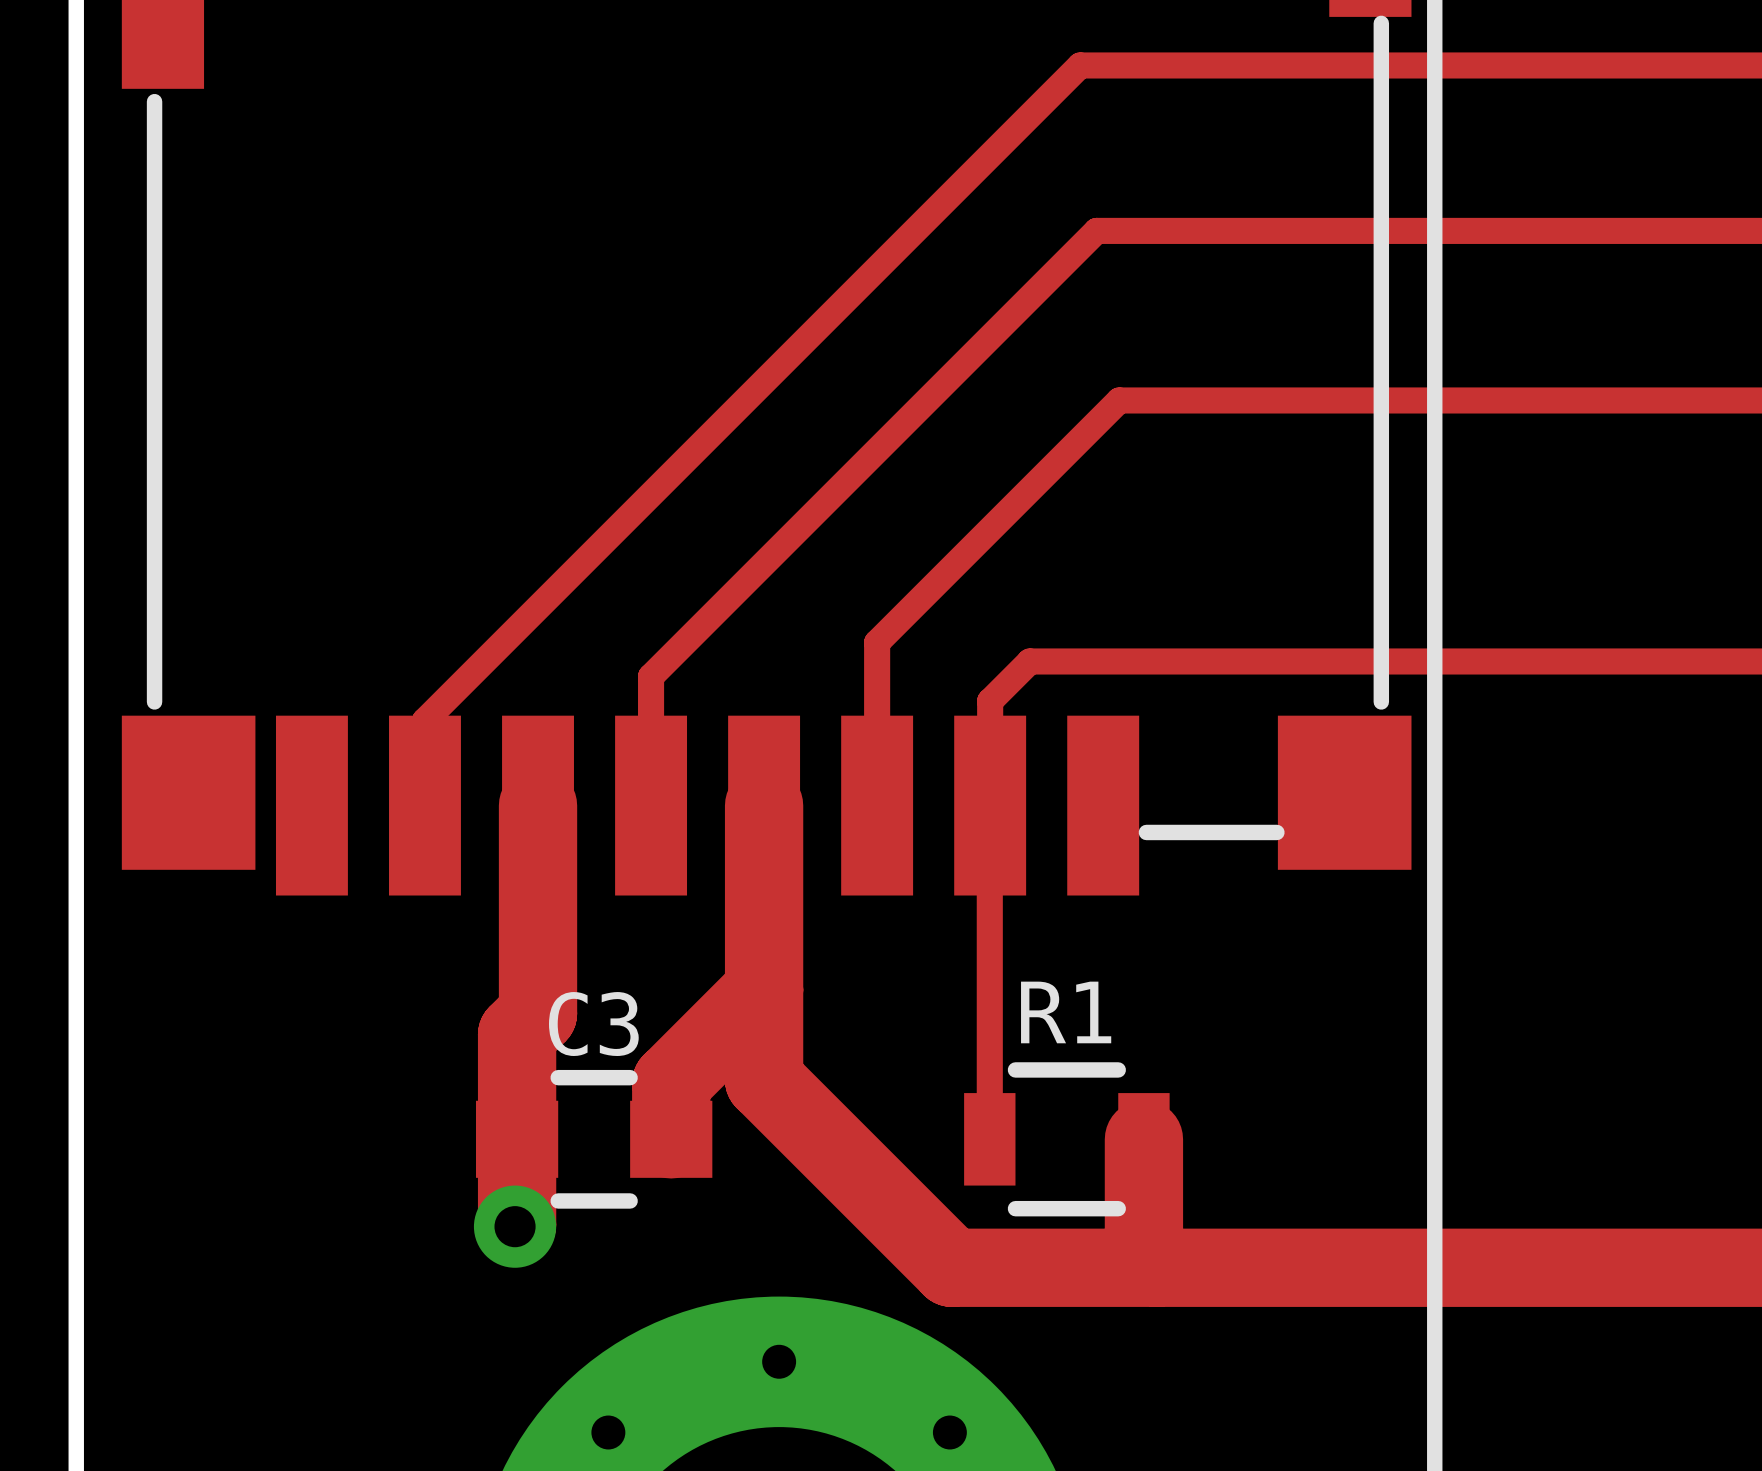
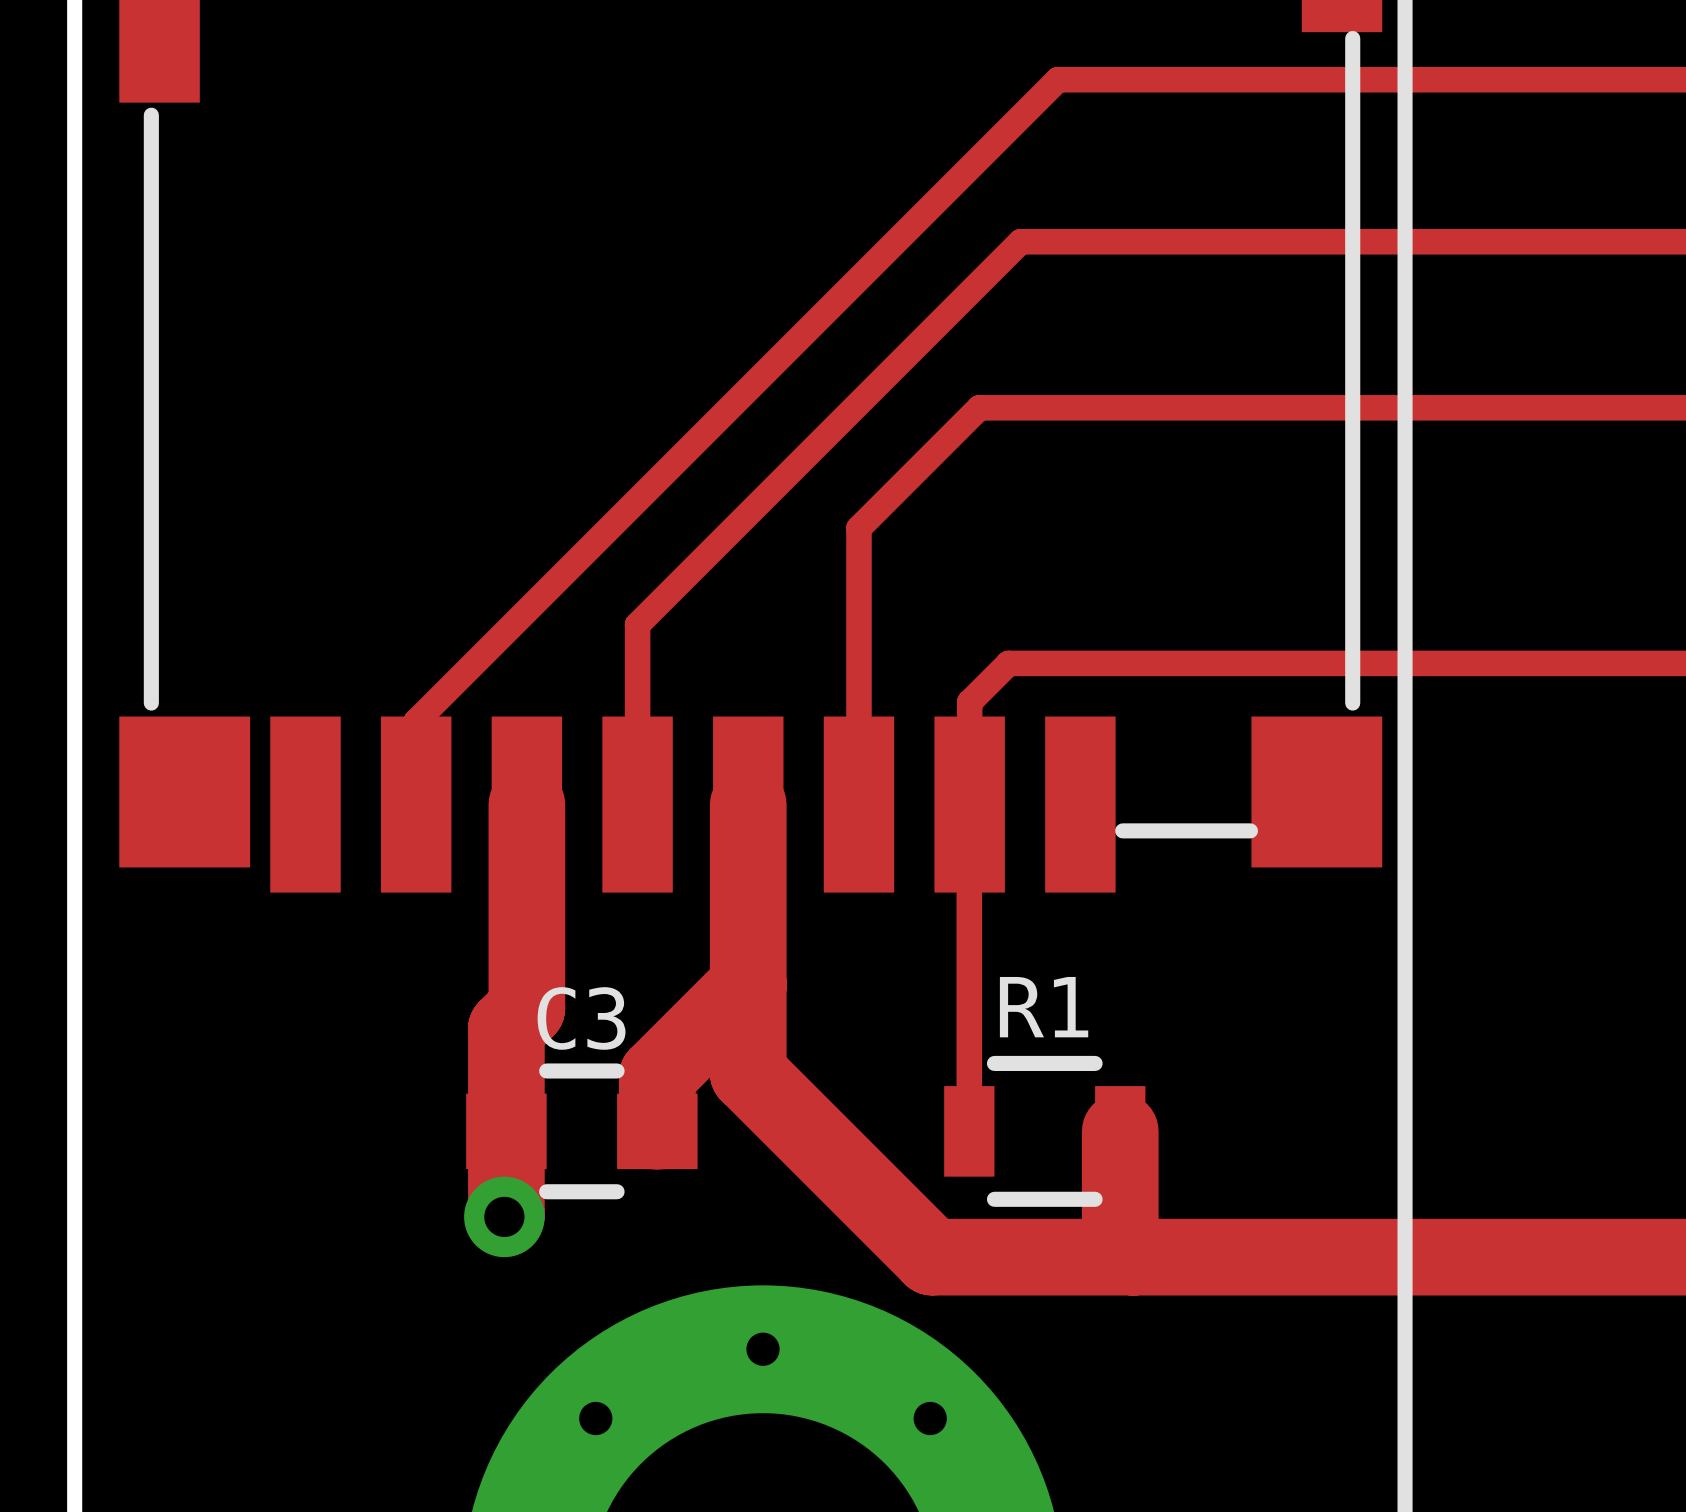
top track: (1096, 230) (651, 676) -> (1073, 241) (1020, 241) (637, 624) (637, 678)
top track: (1119, 400) (877, 642) -> (1096, 407) (979, 407) (858, 528) (858, 644)

